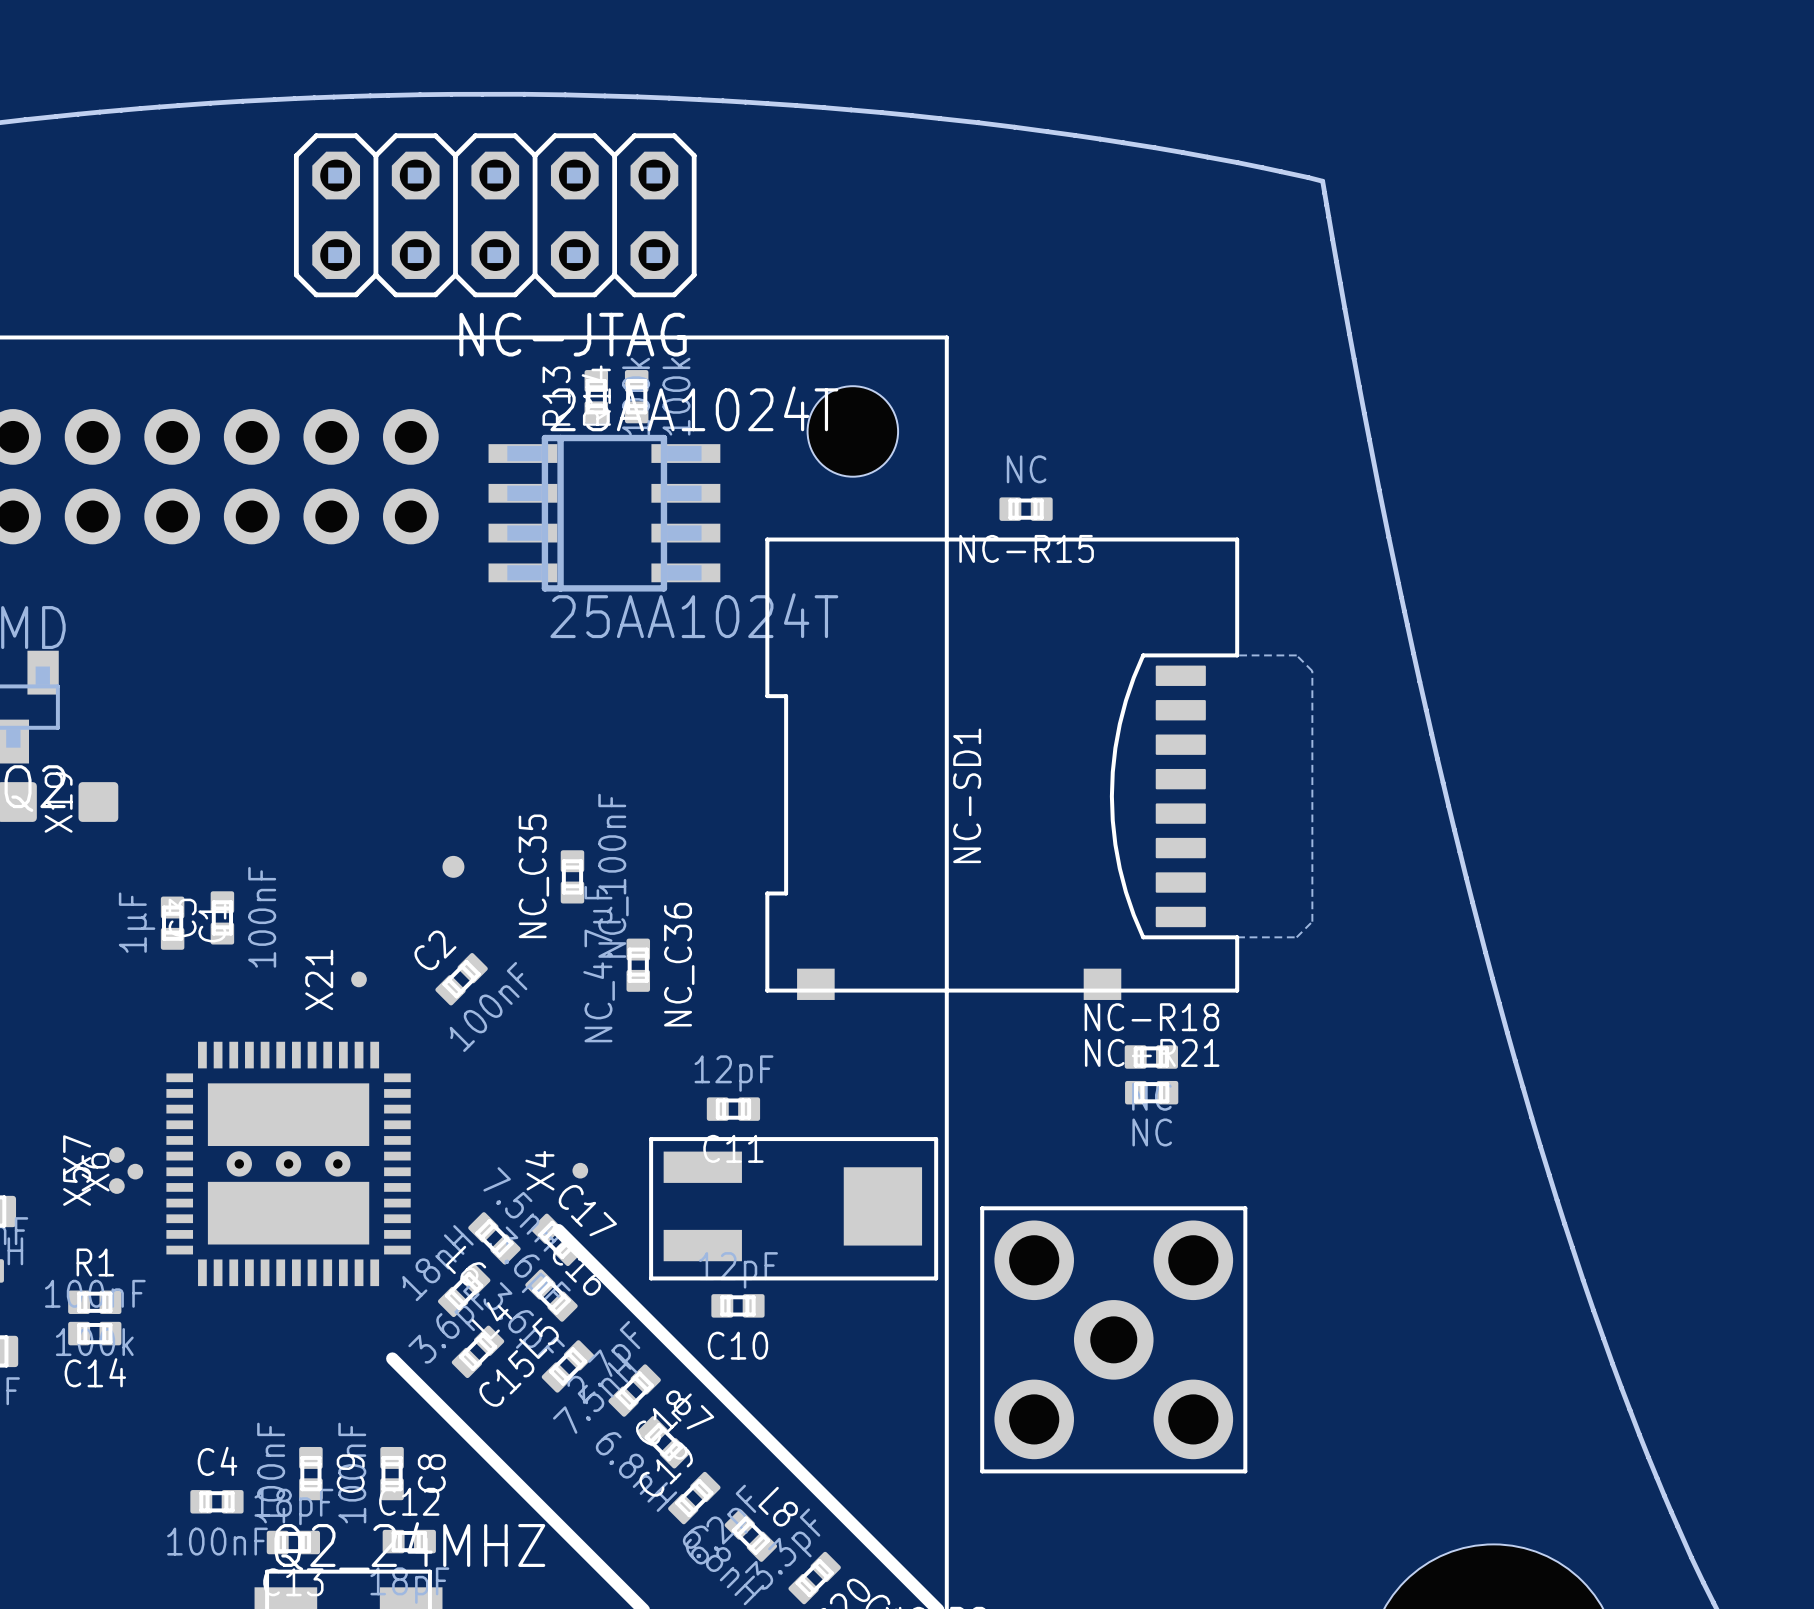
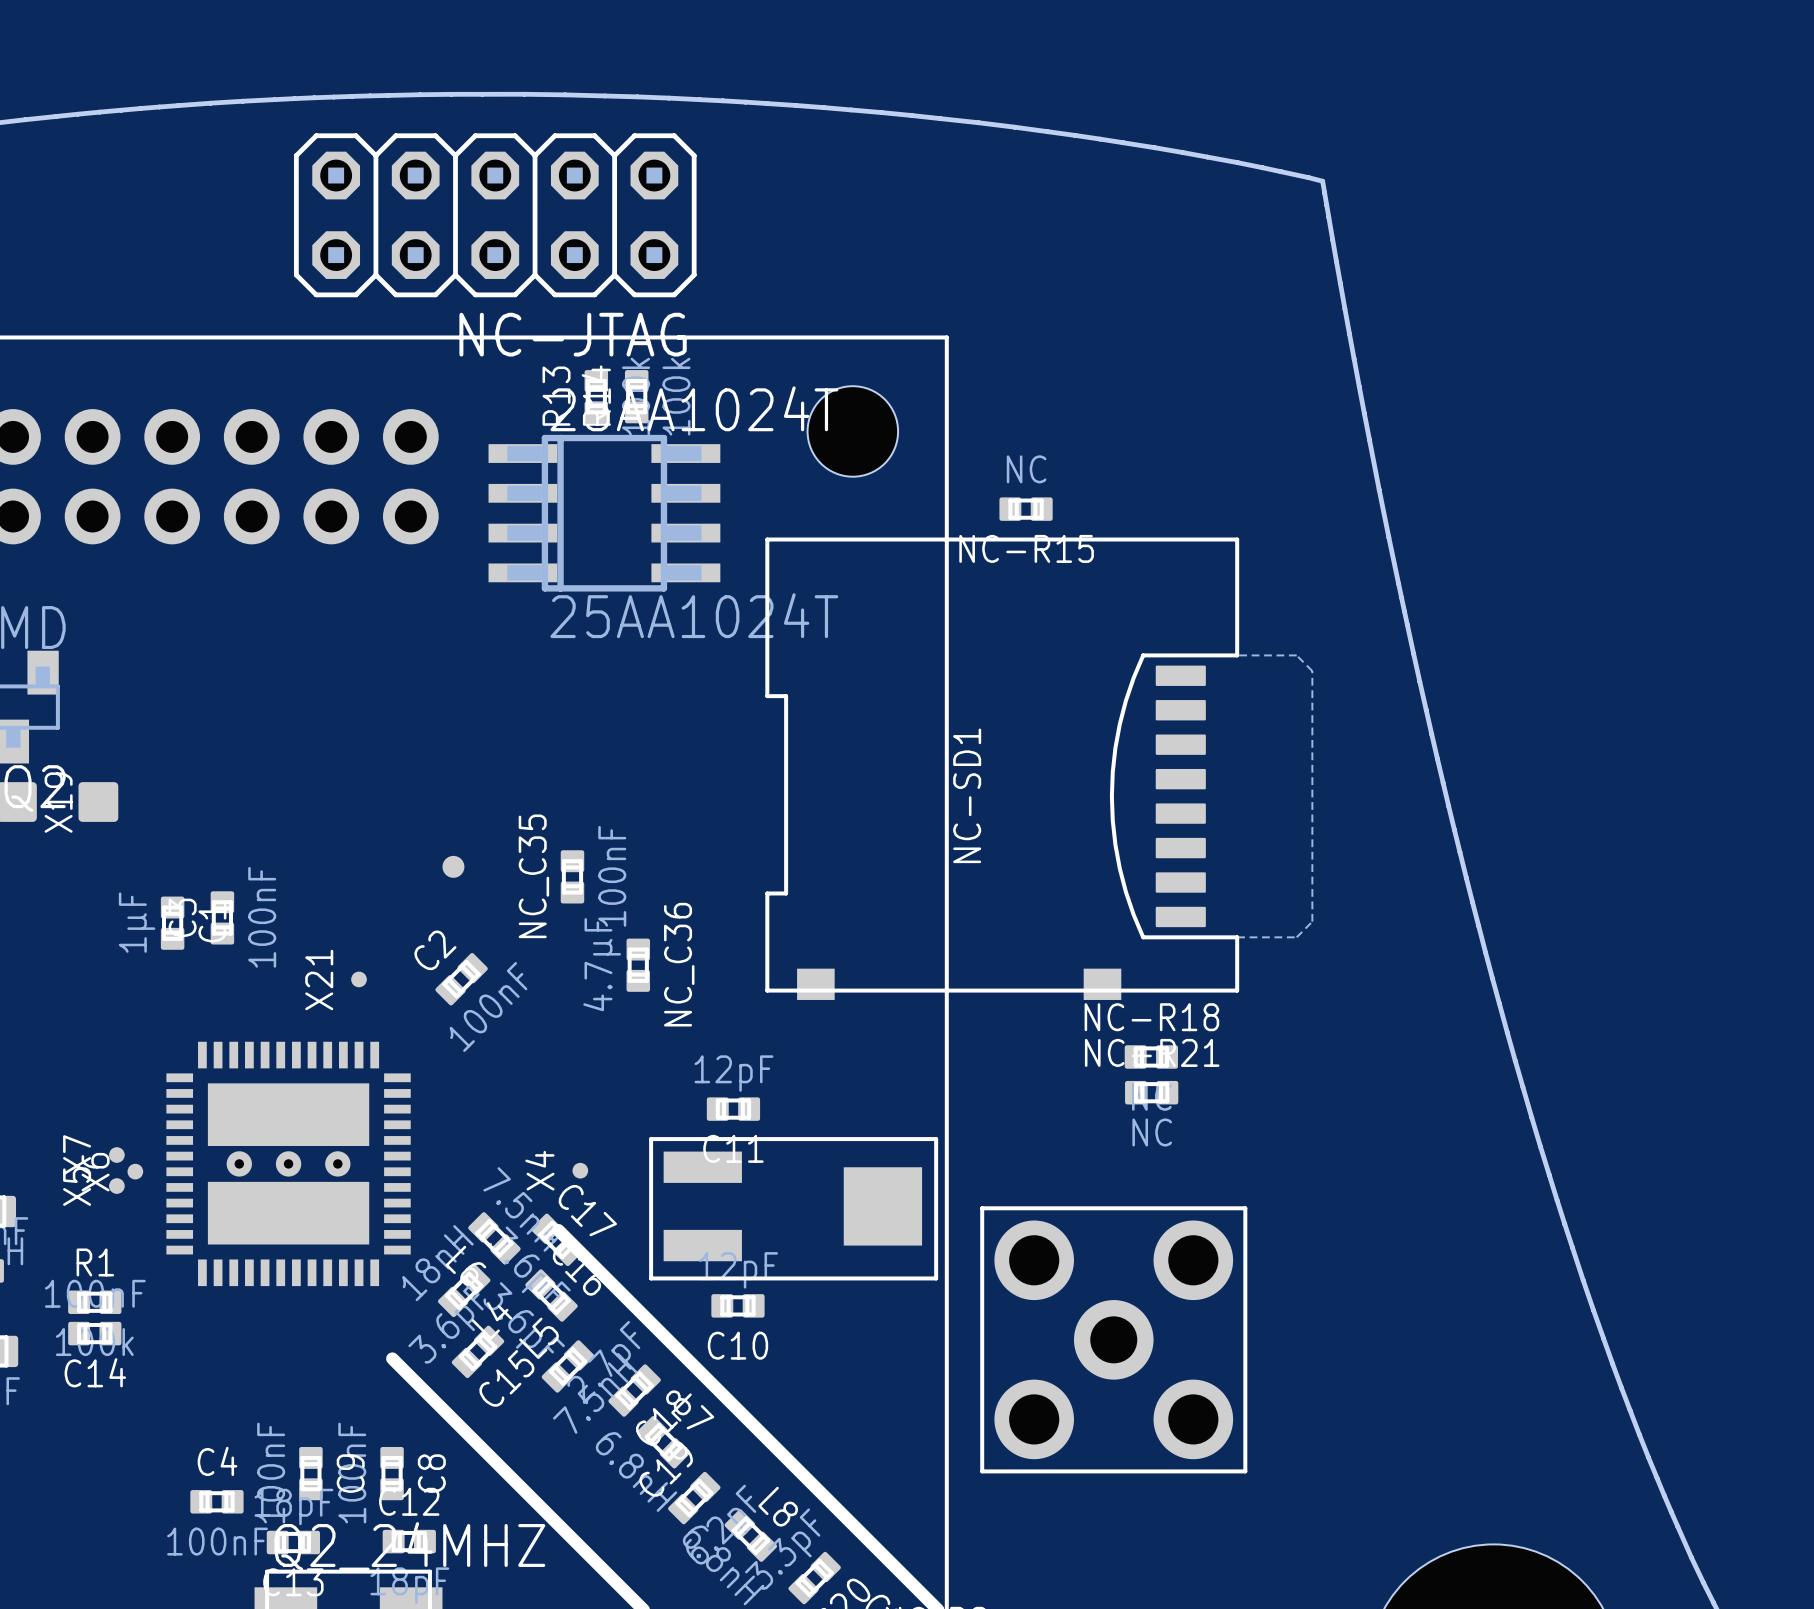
NC_C35 value: NC_100nF (613, 875) -> 100nF (612, 876)
NC_C36 value: NC_4.7µF (602, 964) -> 4.7µF (602, 964)

